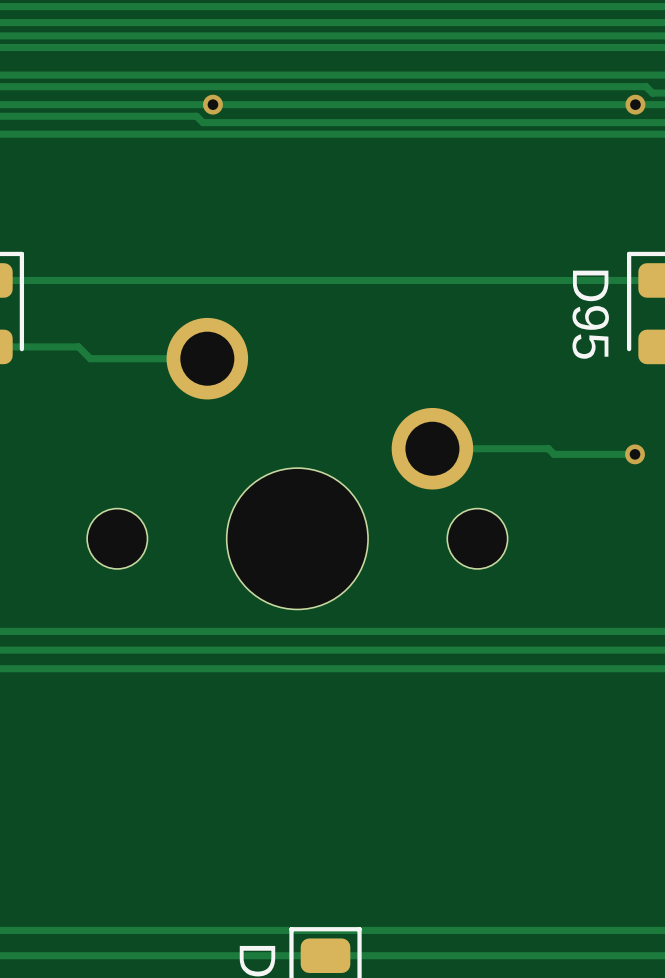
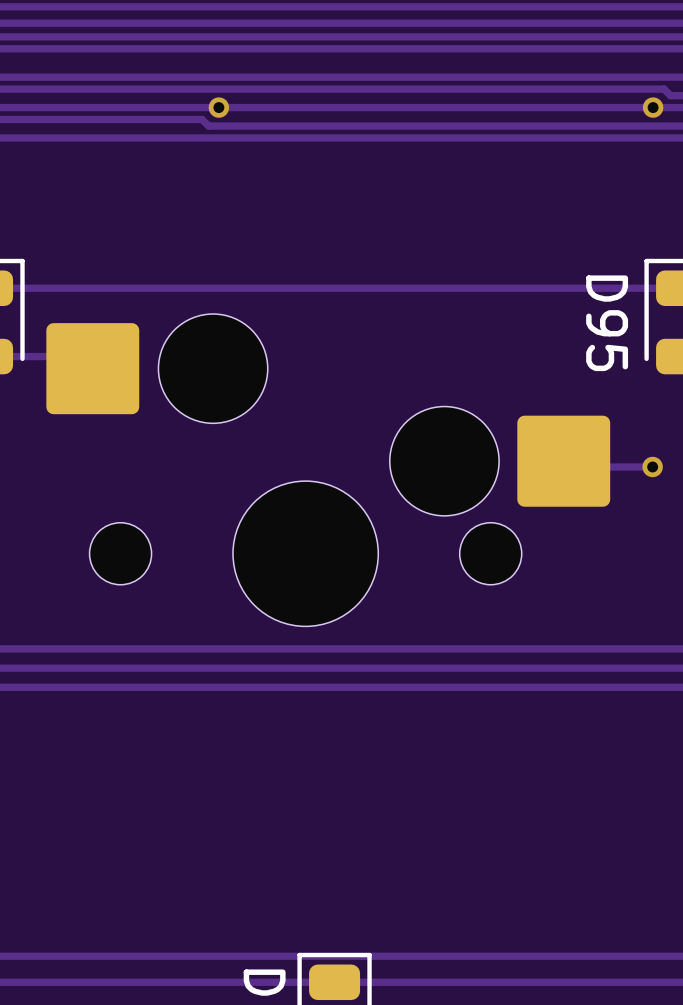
part footprint: [87, 317, 508, 610] -> [46, 314, 611, 627]
track: (207, 358) (90, 358) -> none
track: (432, 448) (548, 448) (554, 454) -> none

